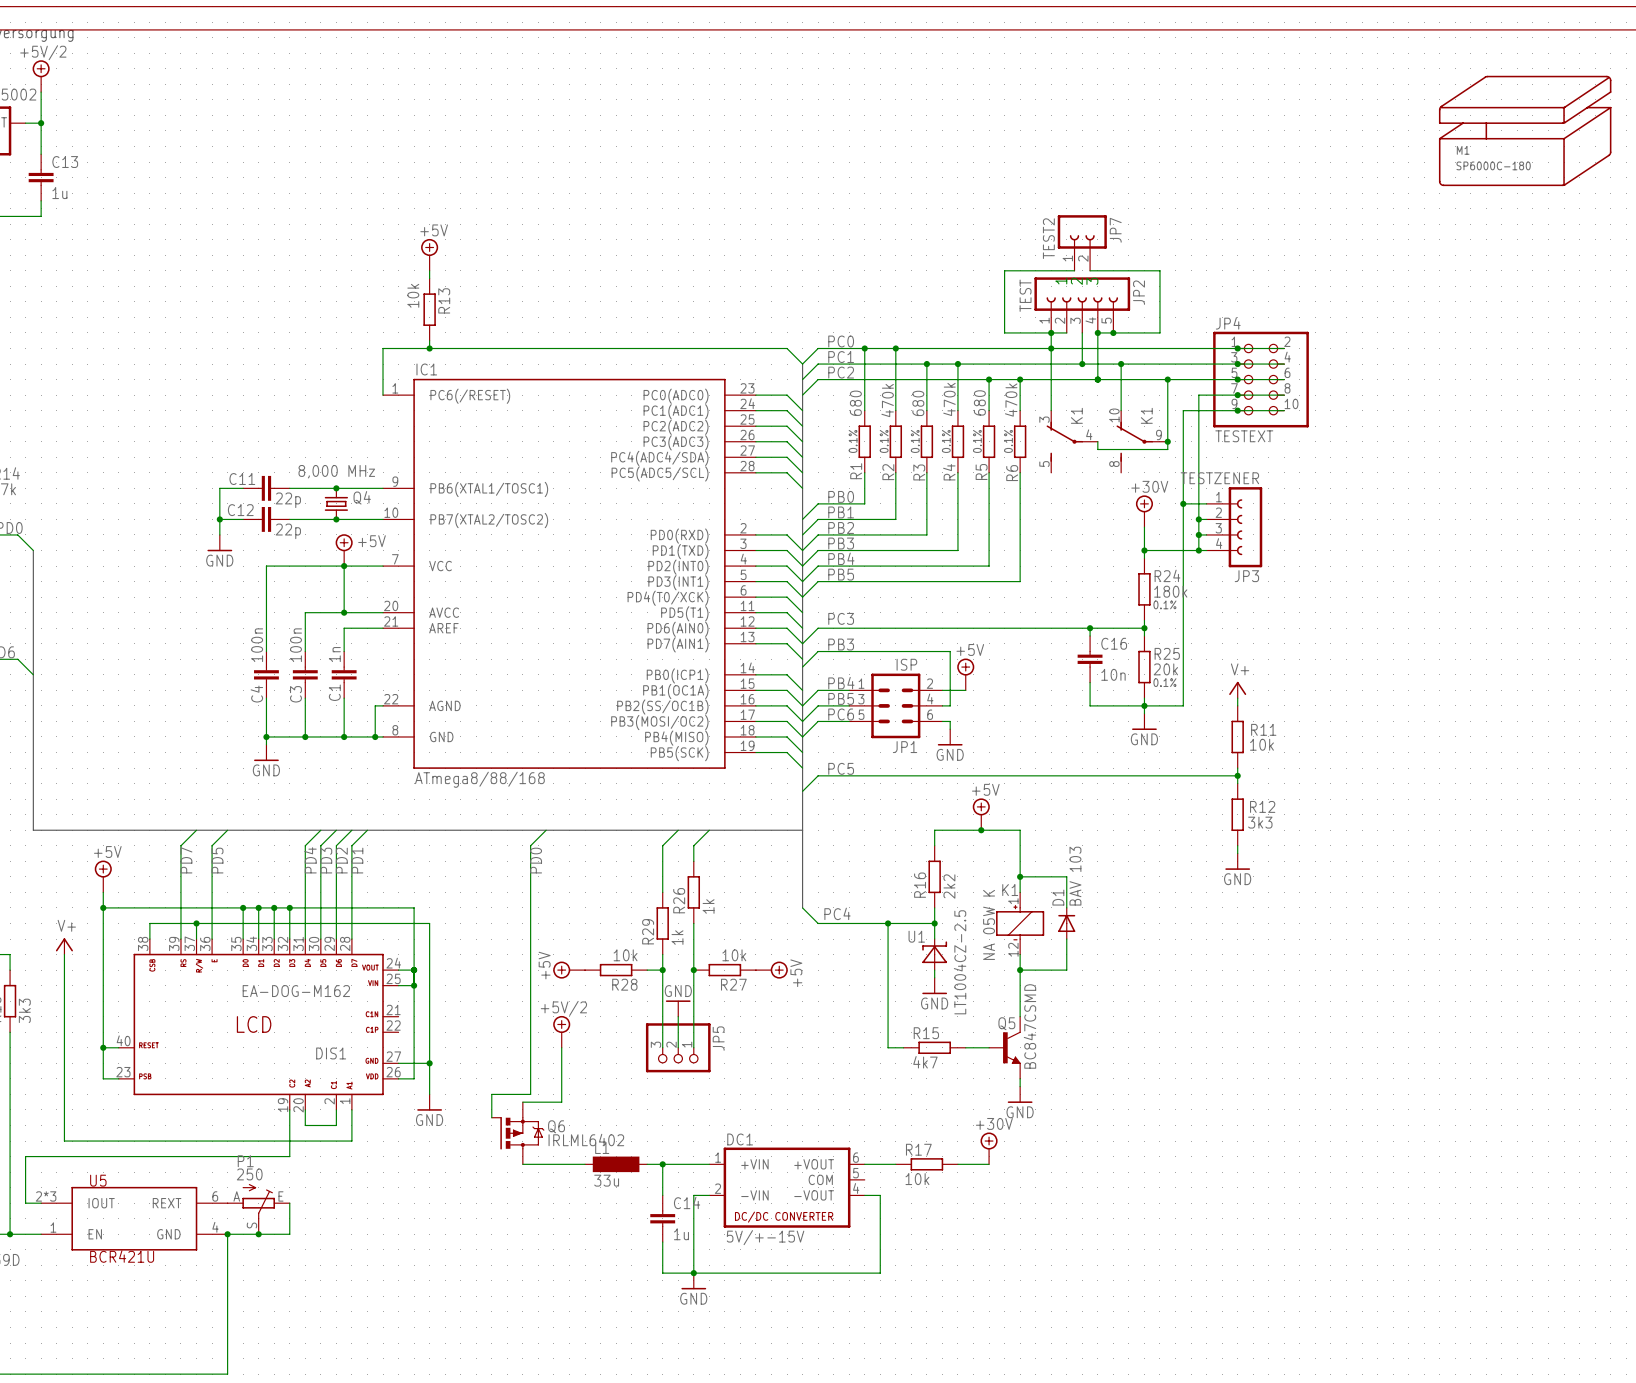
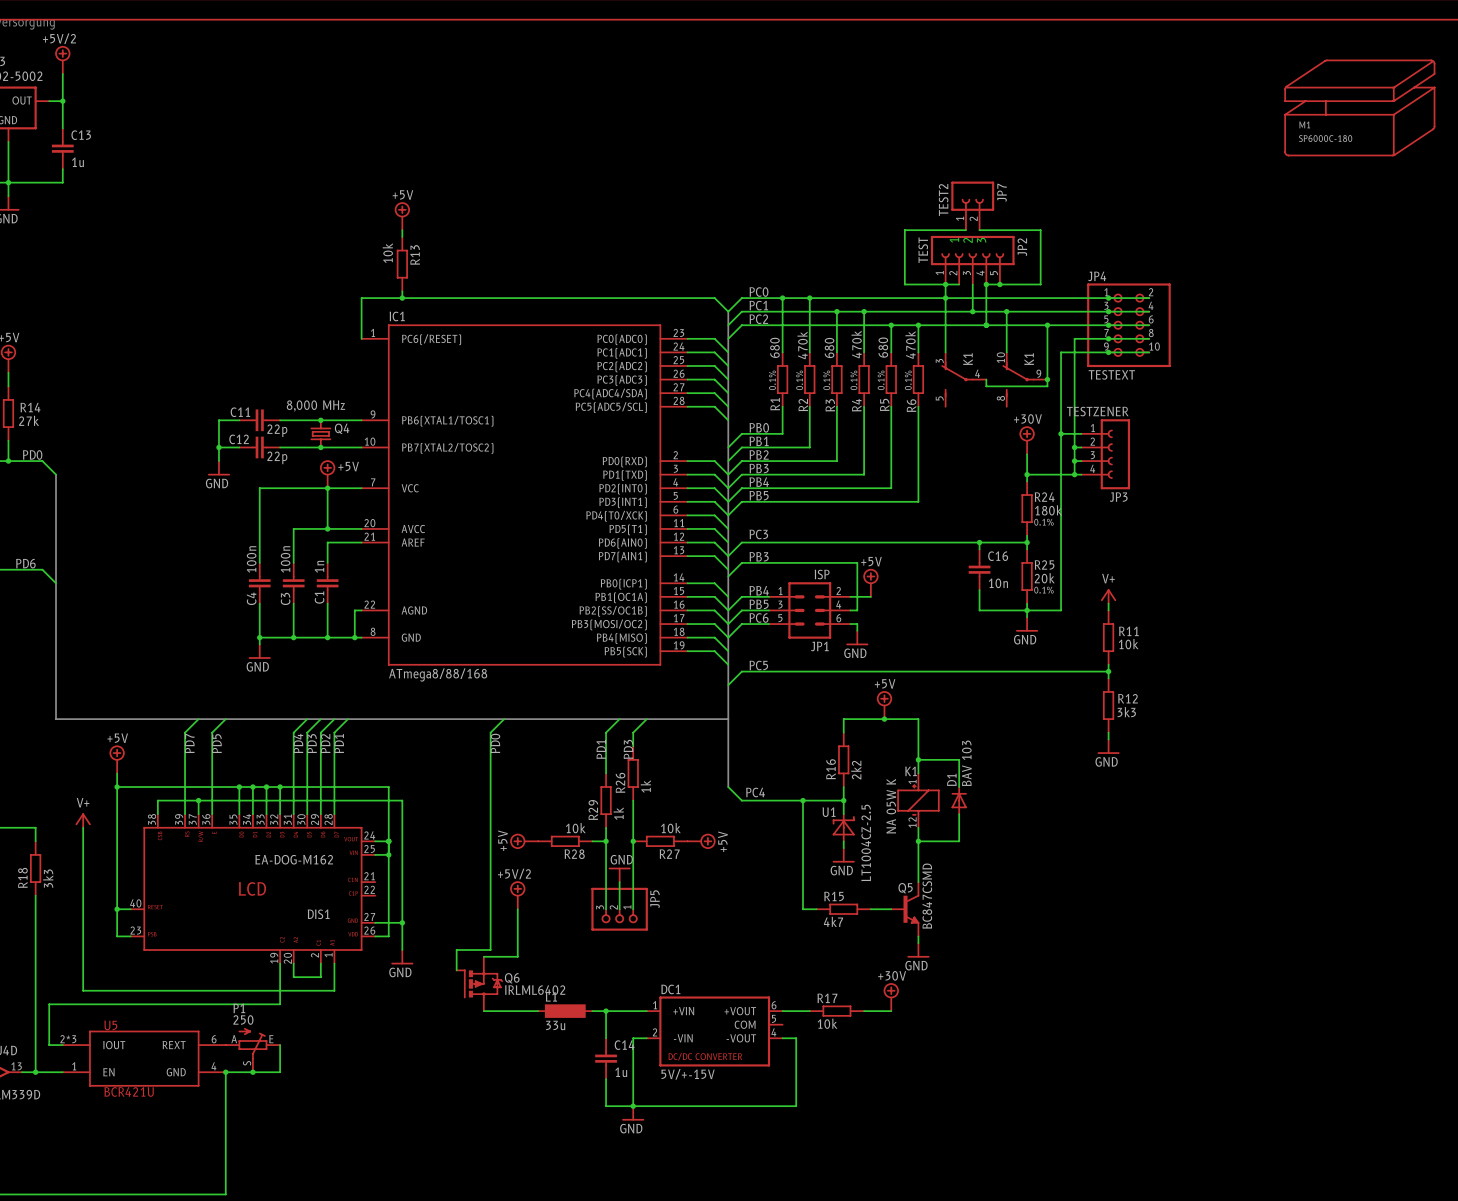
label: none -> PD1 (601, 749)
label: none -> PD3 (628, 749)

